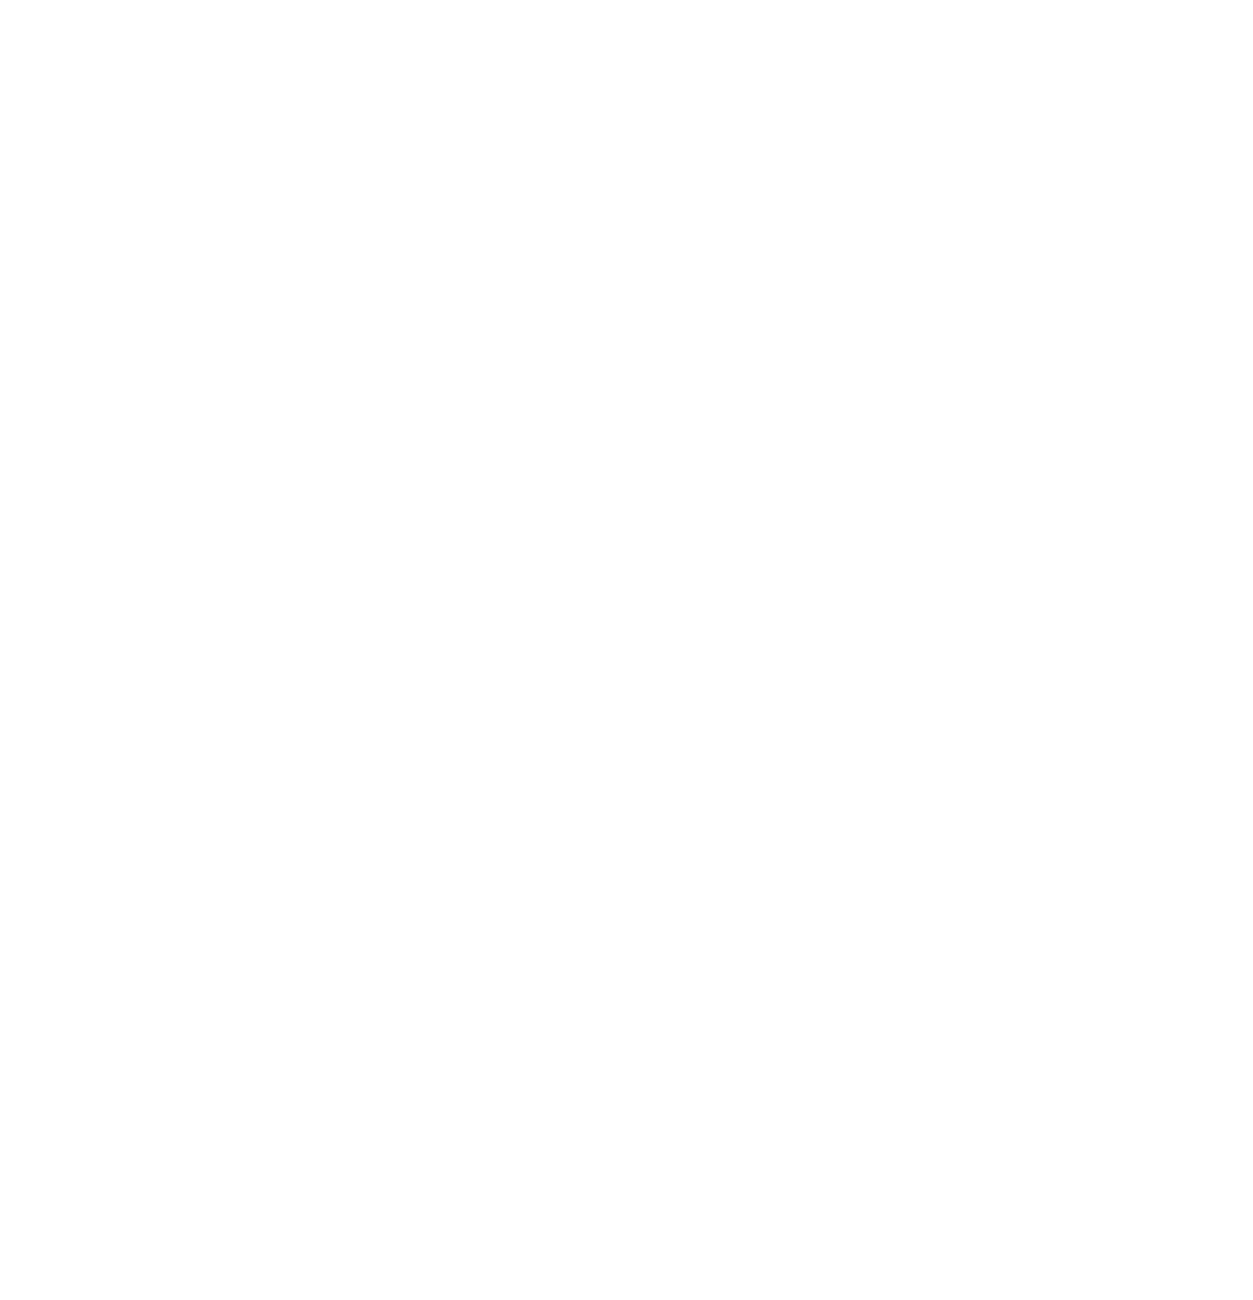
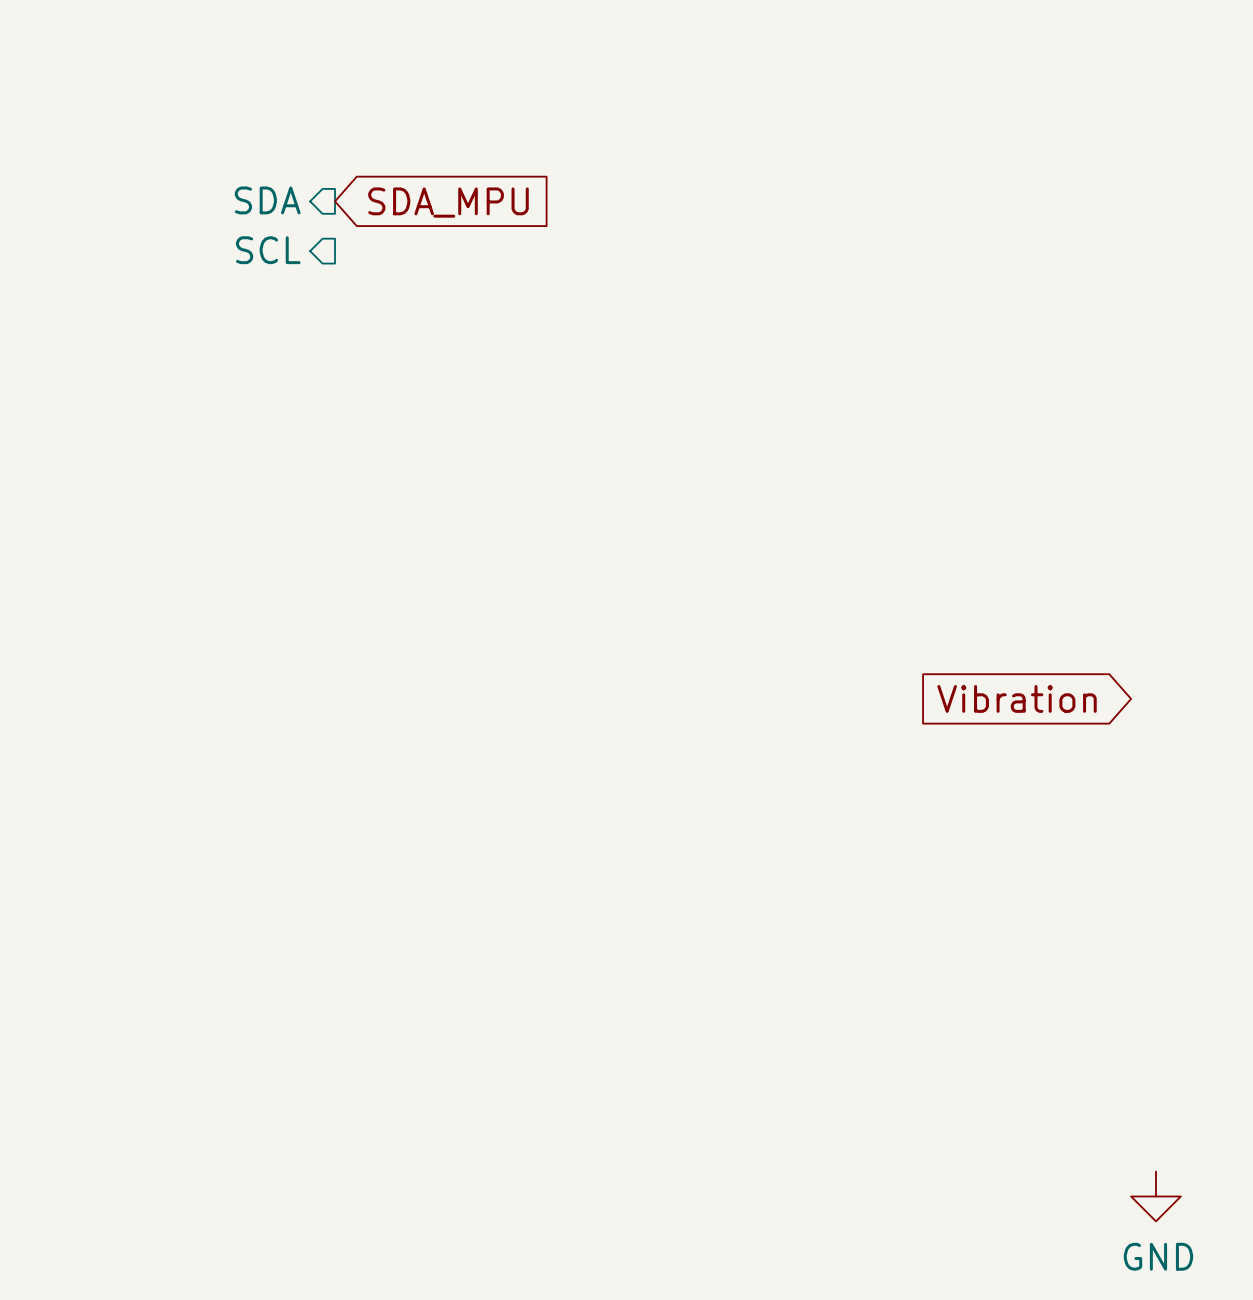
sheet pin: none -> SDA (267, 200)
global label: none -> SDA_MPU (448, 202)
sheet pin: none -> SCL (268, 250)
global label: none -> Vibration (1017, 698)
power symbol: none -> GND (1155, 1196)

